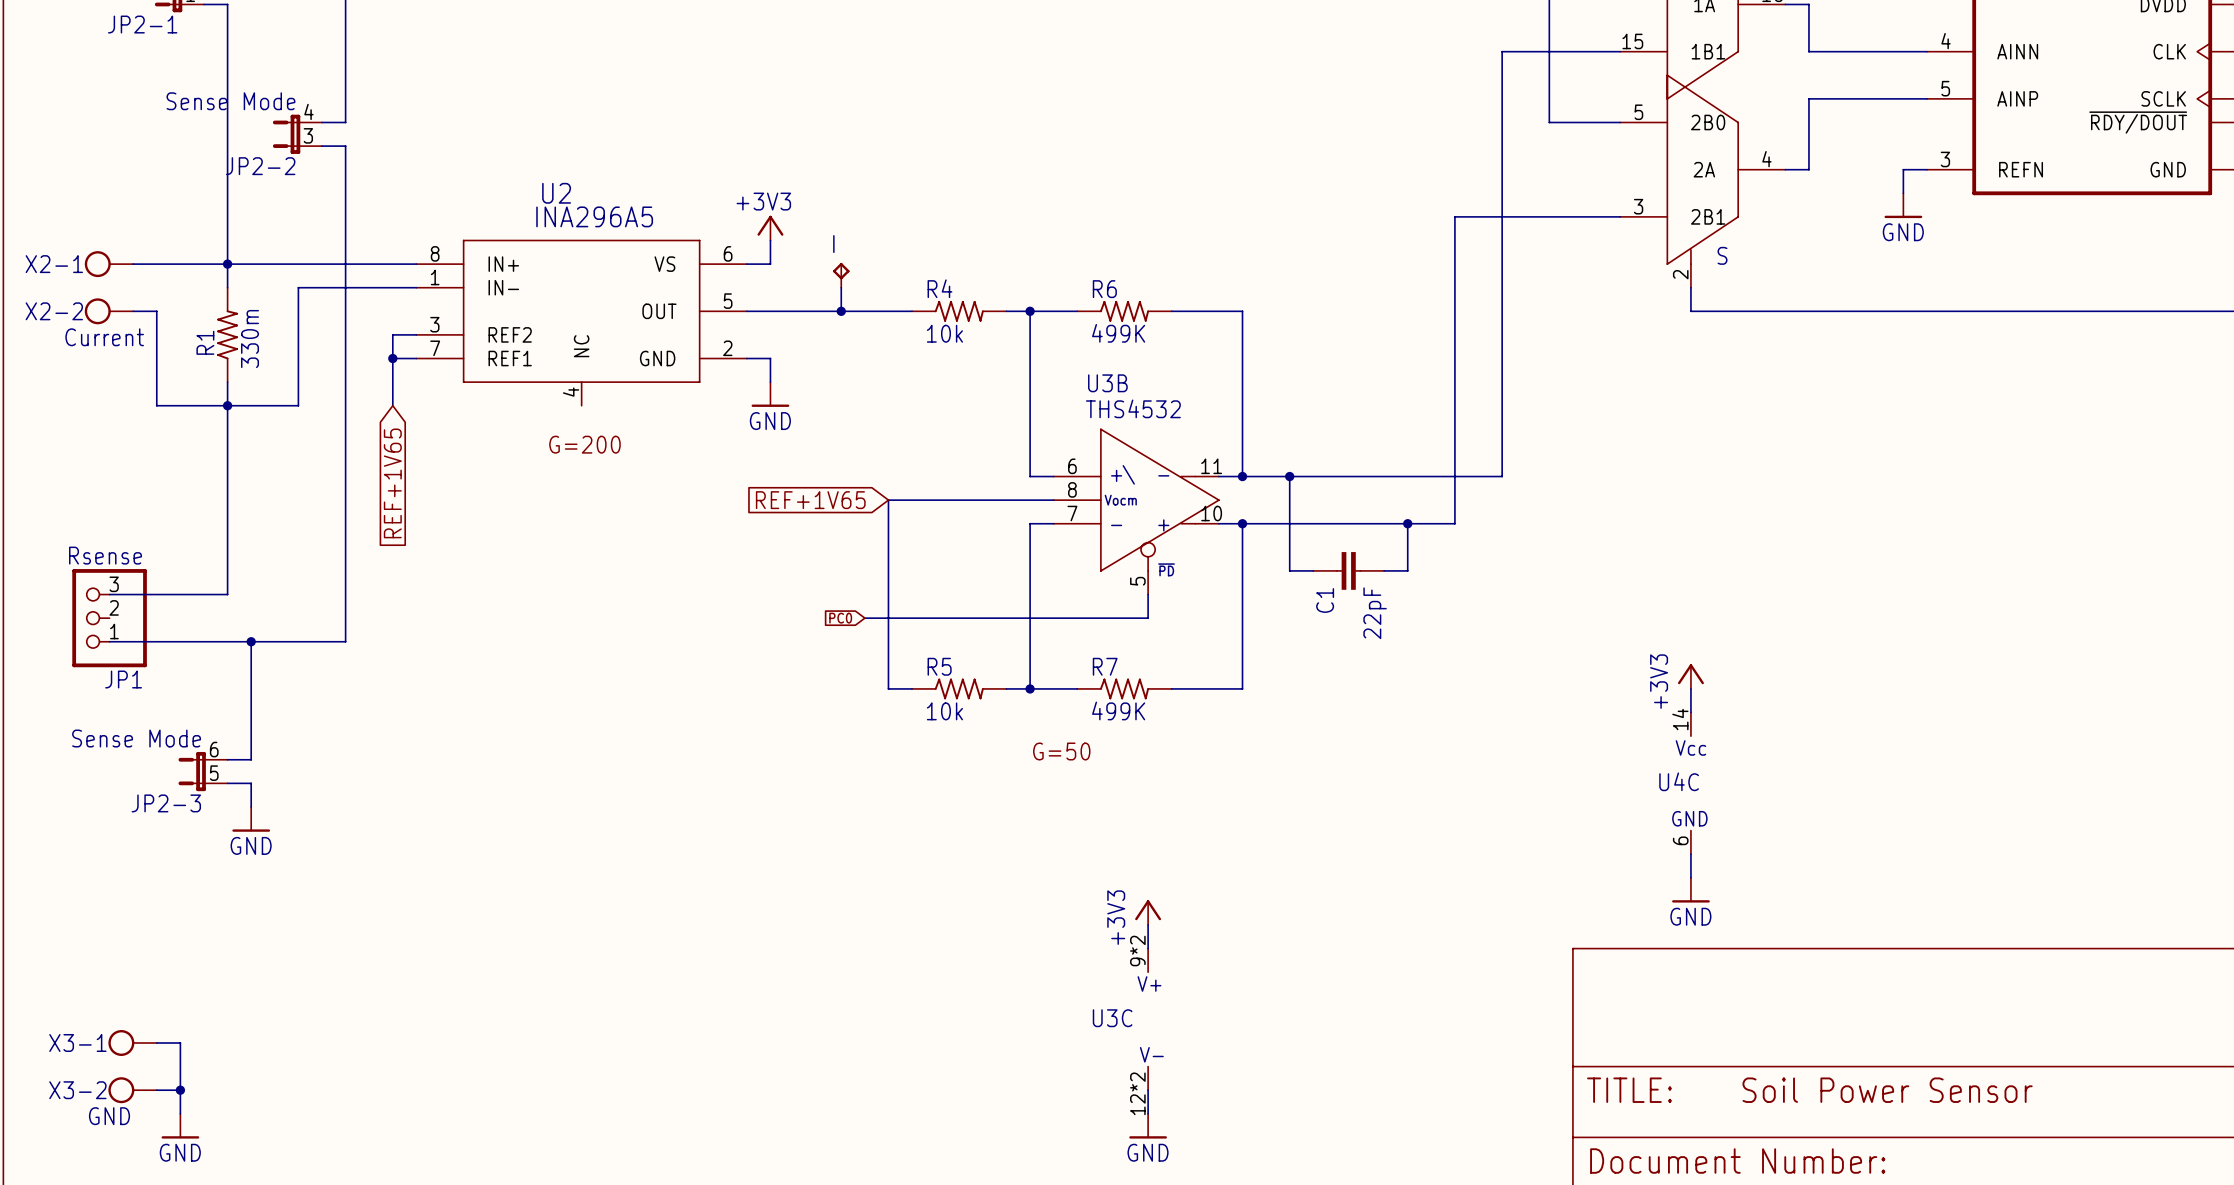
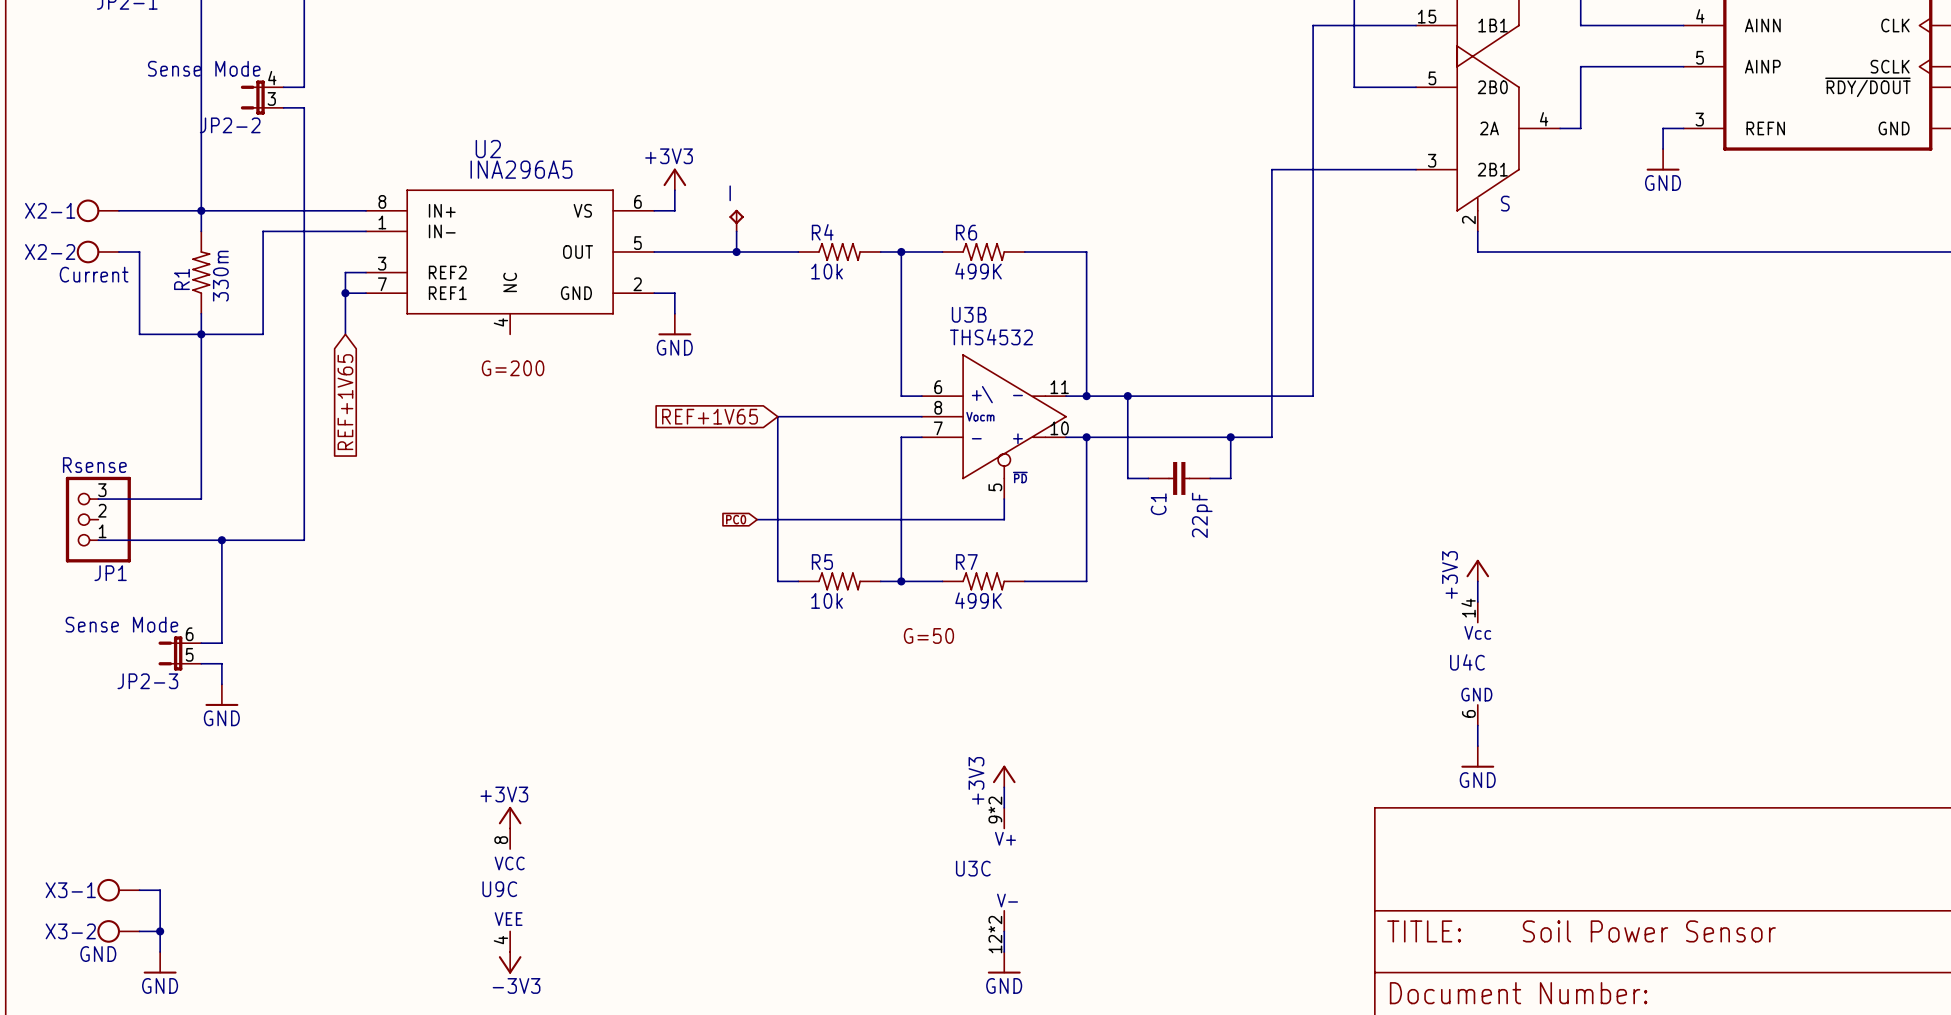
power symbol: none -> +3V3 (510, 817)
U9C: none -> (510, 890)
power symbol: none -> -3V3 (510, 962)

